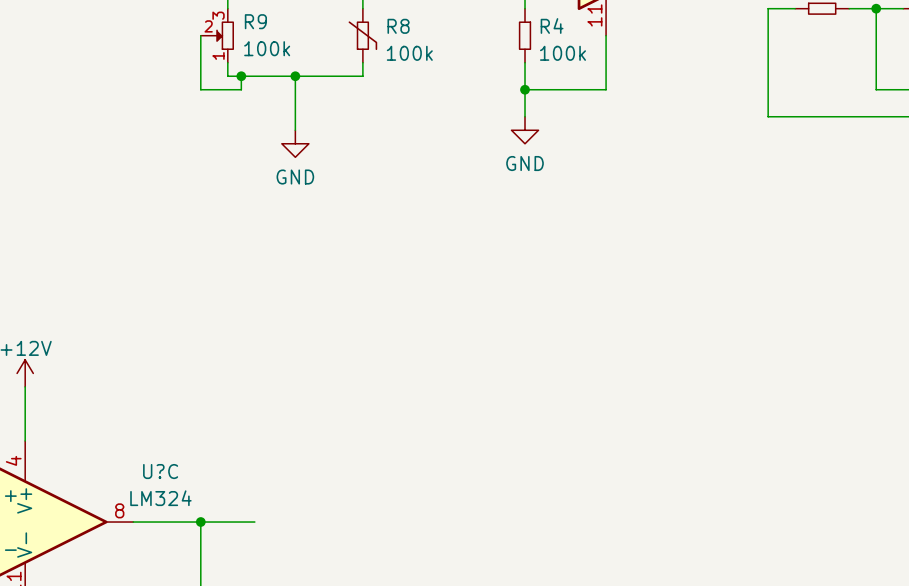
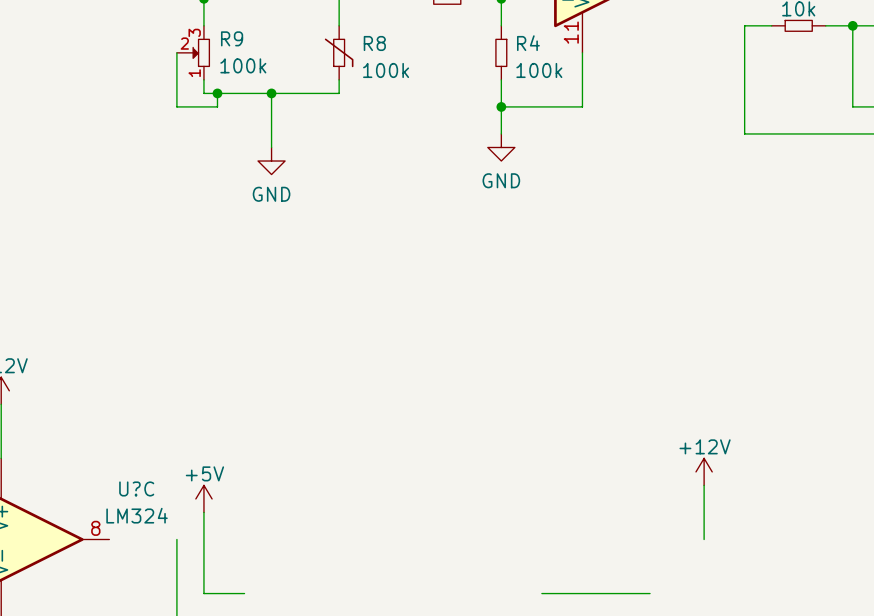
power symbol: none -> +12V (704, 471)
wire: none -> (704, 485) (704, 539)
power symbol: none -> +5V (203, 498)
wire: none -> (203, 512) (203, 593) (244, 593)
wire: (133, 522) (254, 522) -> none
junction: (200, 522) -> none
wire: none -> (541, 593) (650, 593)

